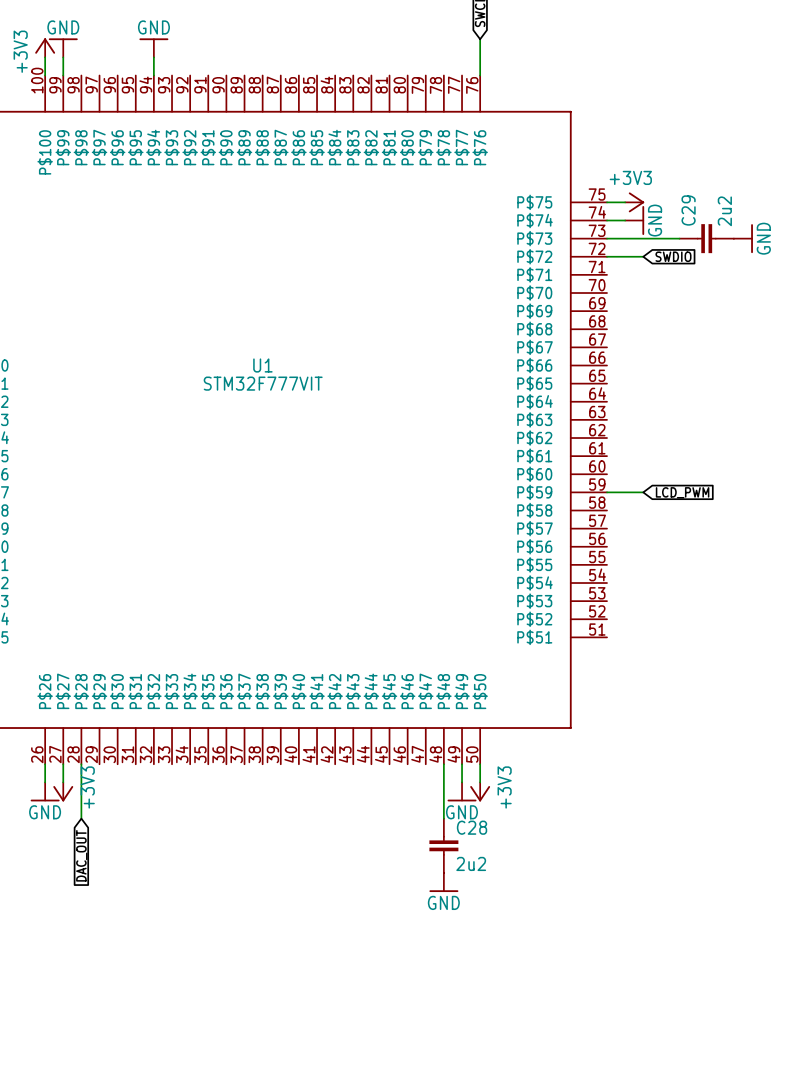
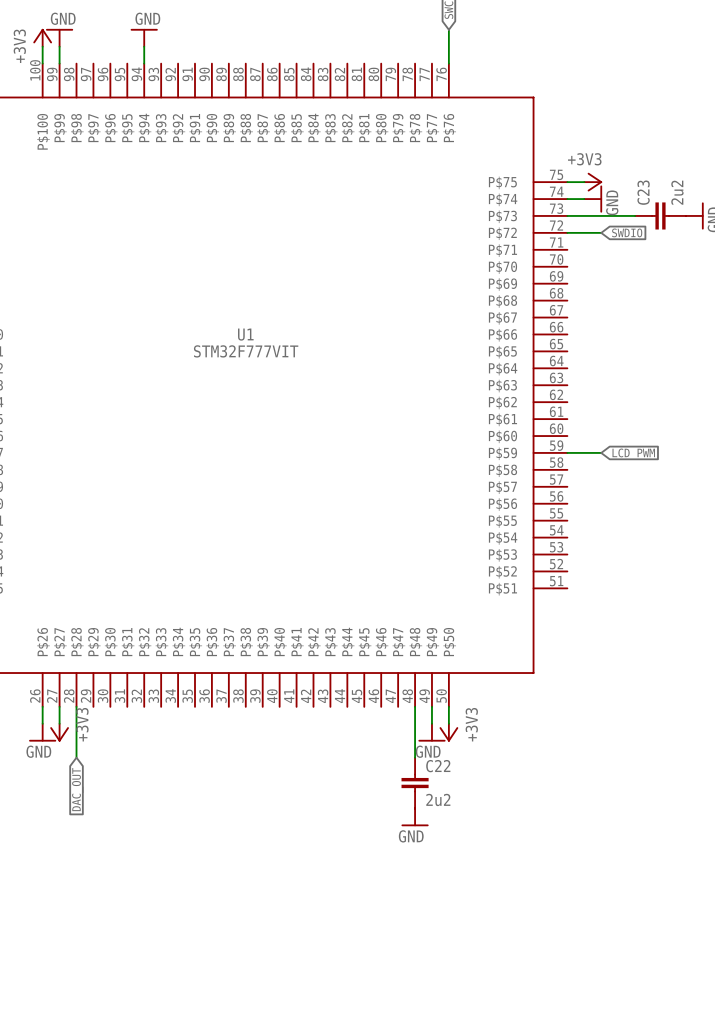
C29 name: C29 (688, 210) -> C23 (643, 192)
C28 name: C28 (472, 827) -> C22 (438, 766)

